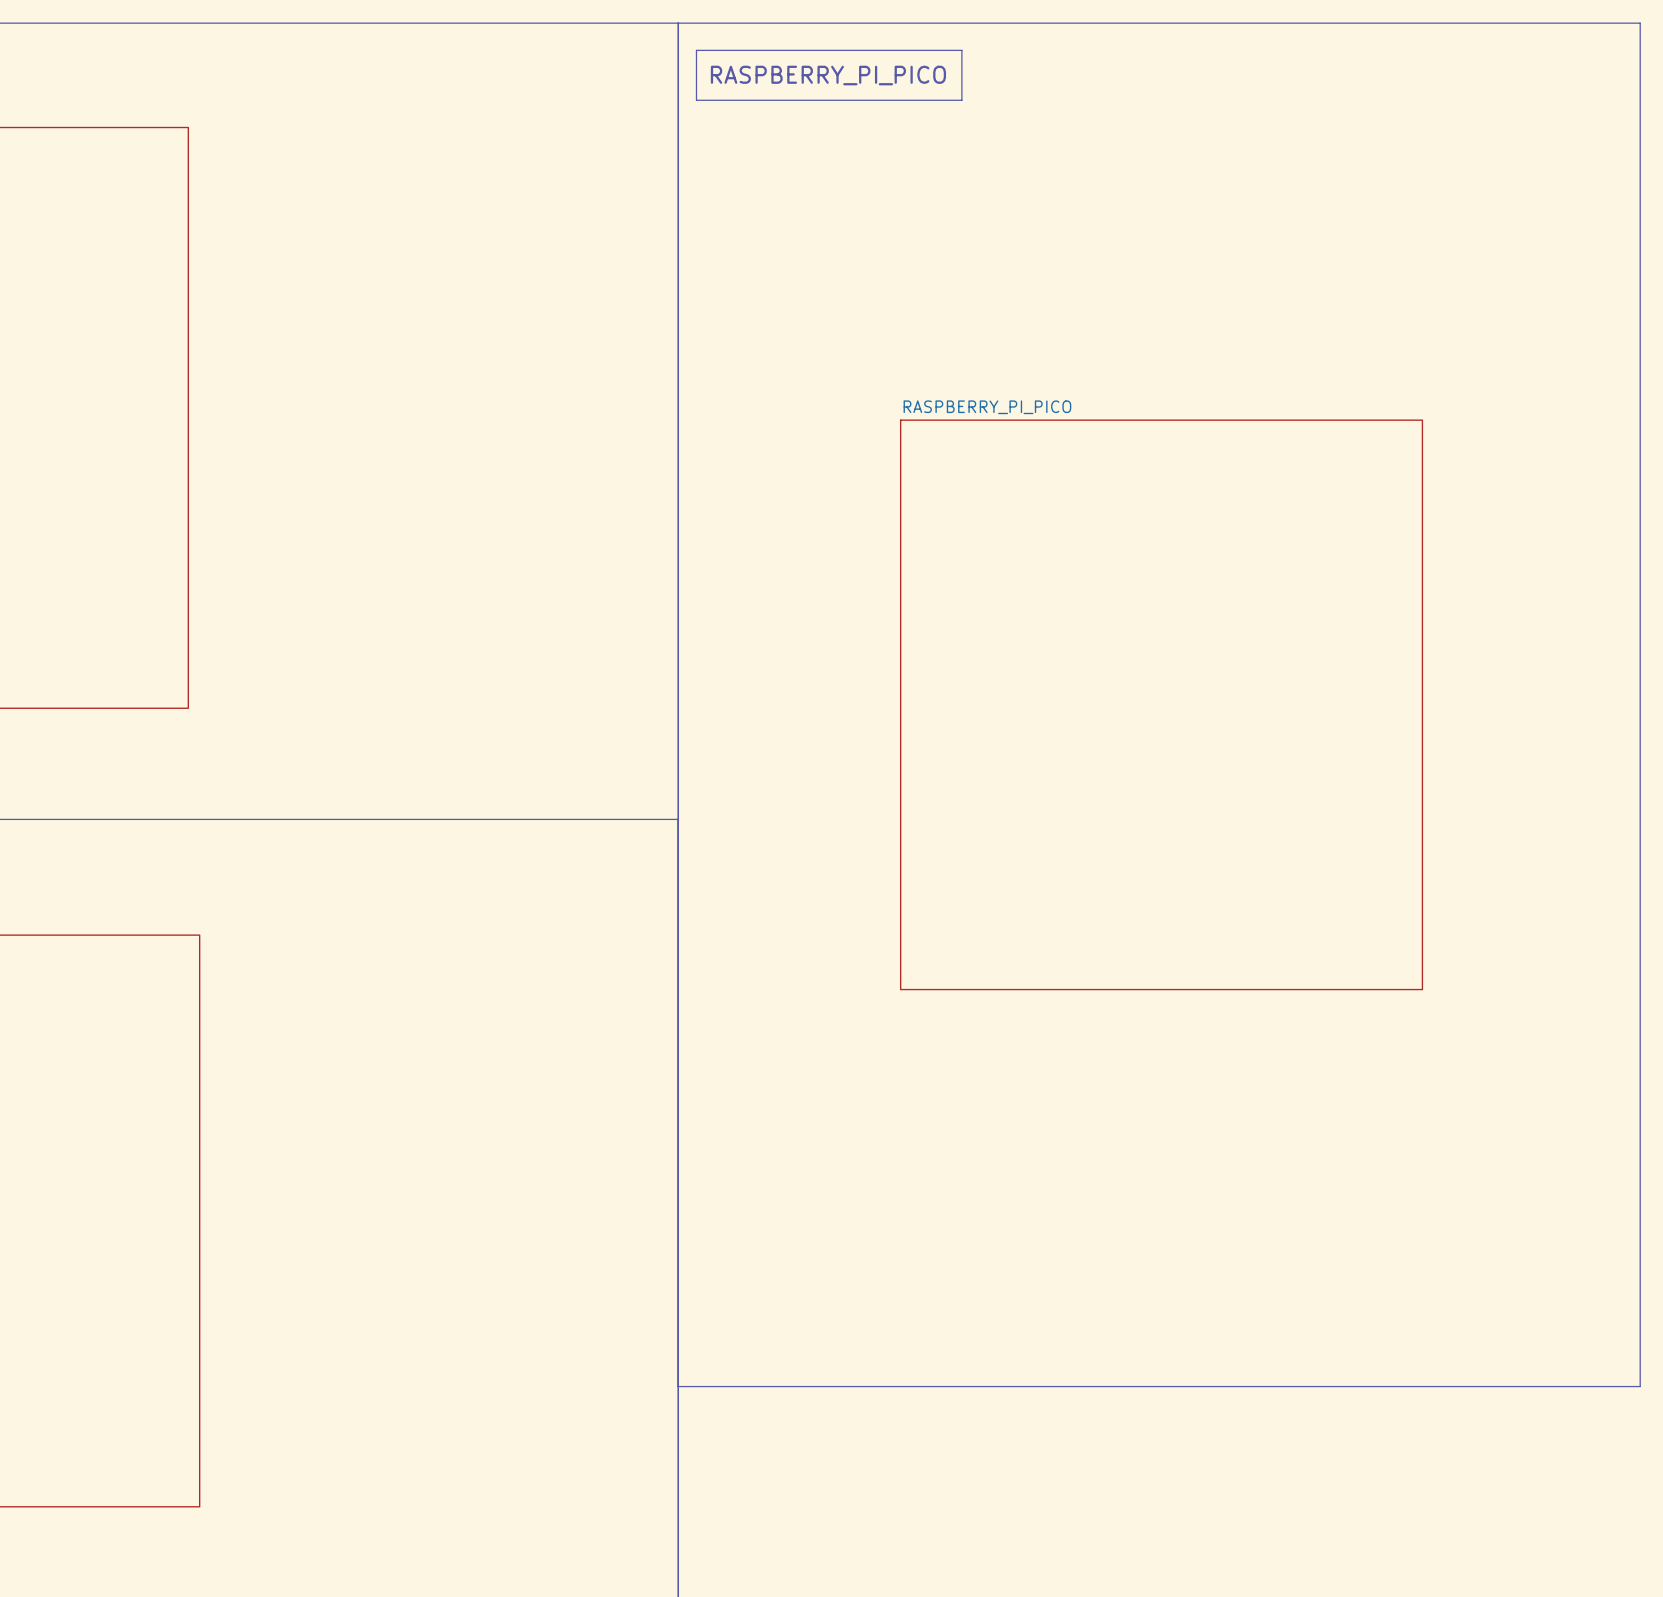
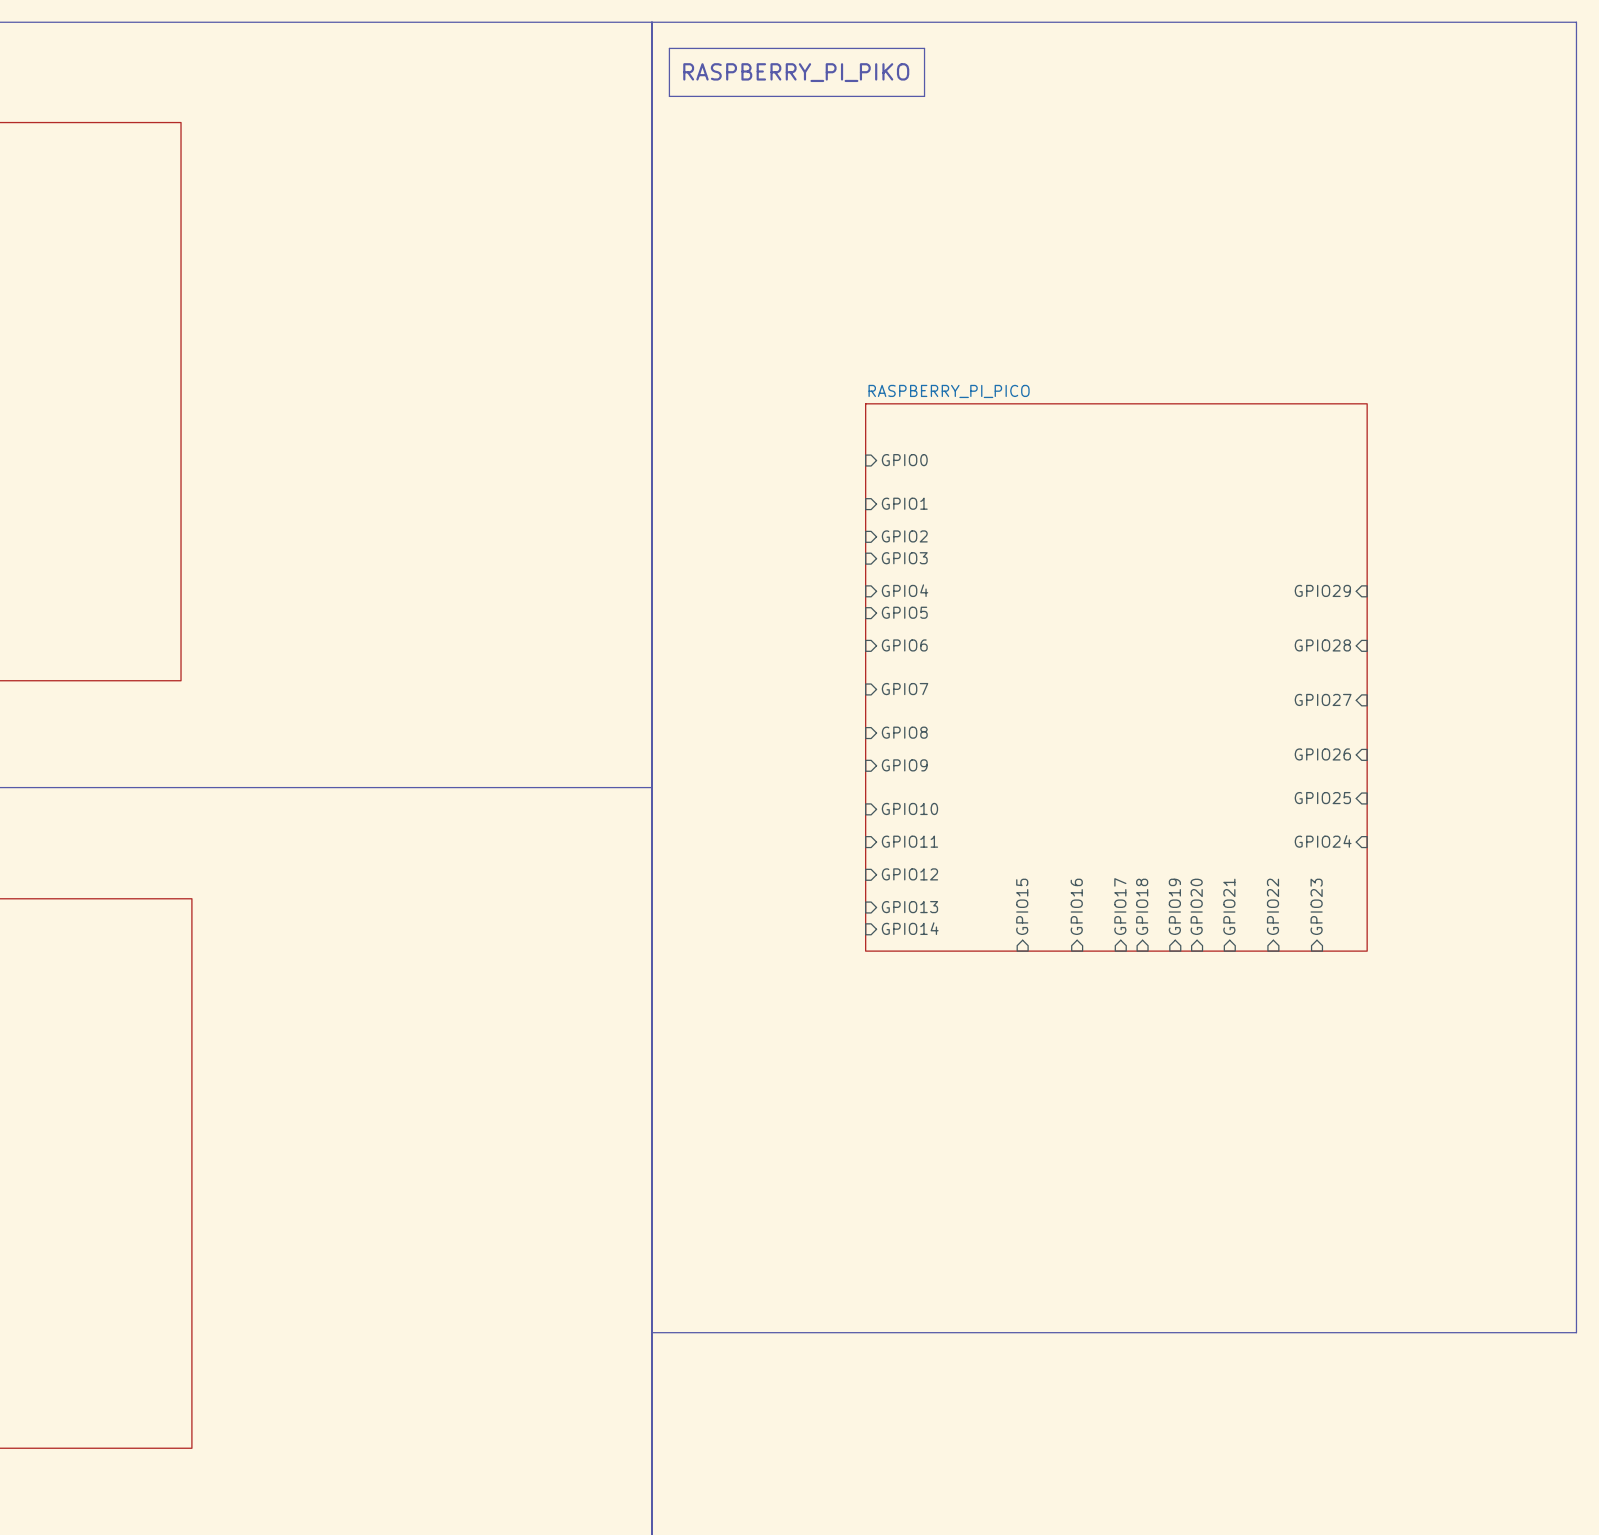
text: RASPBERRY_PI_PICO (828, 75) -> RASPBERRY_PI_PIKO (796, 72)
sheet pin: none -> GPIO0 (904, 460)
sheet pin: none -> GPIO1 (904, 503)
sheet pin: none -> GPIO2 (904, 536)
sheet pin: none -> GPIO3 (904, 558)
sheet pin: none -> GPIO4 (905, 590)
sheet pin: none -> GPIO29 (1322, 590)
sheet pin: none -> GPIO5 (904, 612)
sheet pin: none -> GPIO6 (904, 645)
sheet pin: none -> GPIO28 (1322, 645)
sheet pin: none -> GPIO7 (905, 689)
sheet pin: none -> GPIO27 (1323, 699)
sheet pin: none -> GPIO8 (904, 732)
sheet pin: none -> GPIO26 (1322, 754)
sheet pin: none -> GPIO9 (904, 765)
sheet pin: none -> GPIO25 (1322, 798)
sheet pin: none -> GPIO10 (909, 808)
sheet pin: none -> GPIO11 (909, 841)
sheet pin: none -> GPIO24 (1323, 841)
sheet pin: none -> GPIO12 (909, 874)
sheet pin: none -> GPIO13 (909, 907)
sheet pin: none -> GPIO15 (1022, 906)
sheet pin: none -> GPIO16 (1076, 906)
sheet pin: none -> GPIO17 (1120, 906)
sheet pin: none -> GPIO18 (1142, 906)
sheet pin: none -> GPIO19 (1174, 906)
sheet pin: none -> GPIO20 (1196, 906)
sheet pin: none -> GPIO21 (1229, 906)
sheet pin: none -> GPIO22 (1272, 906)
sheet pin: none -> GPIO23 (1316, 906)
sheet pin: none -> GPIO14 (910, 928)

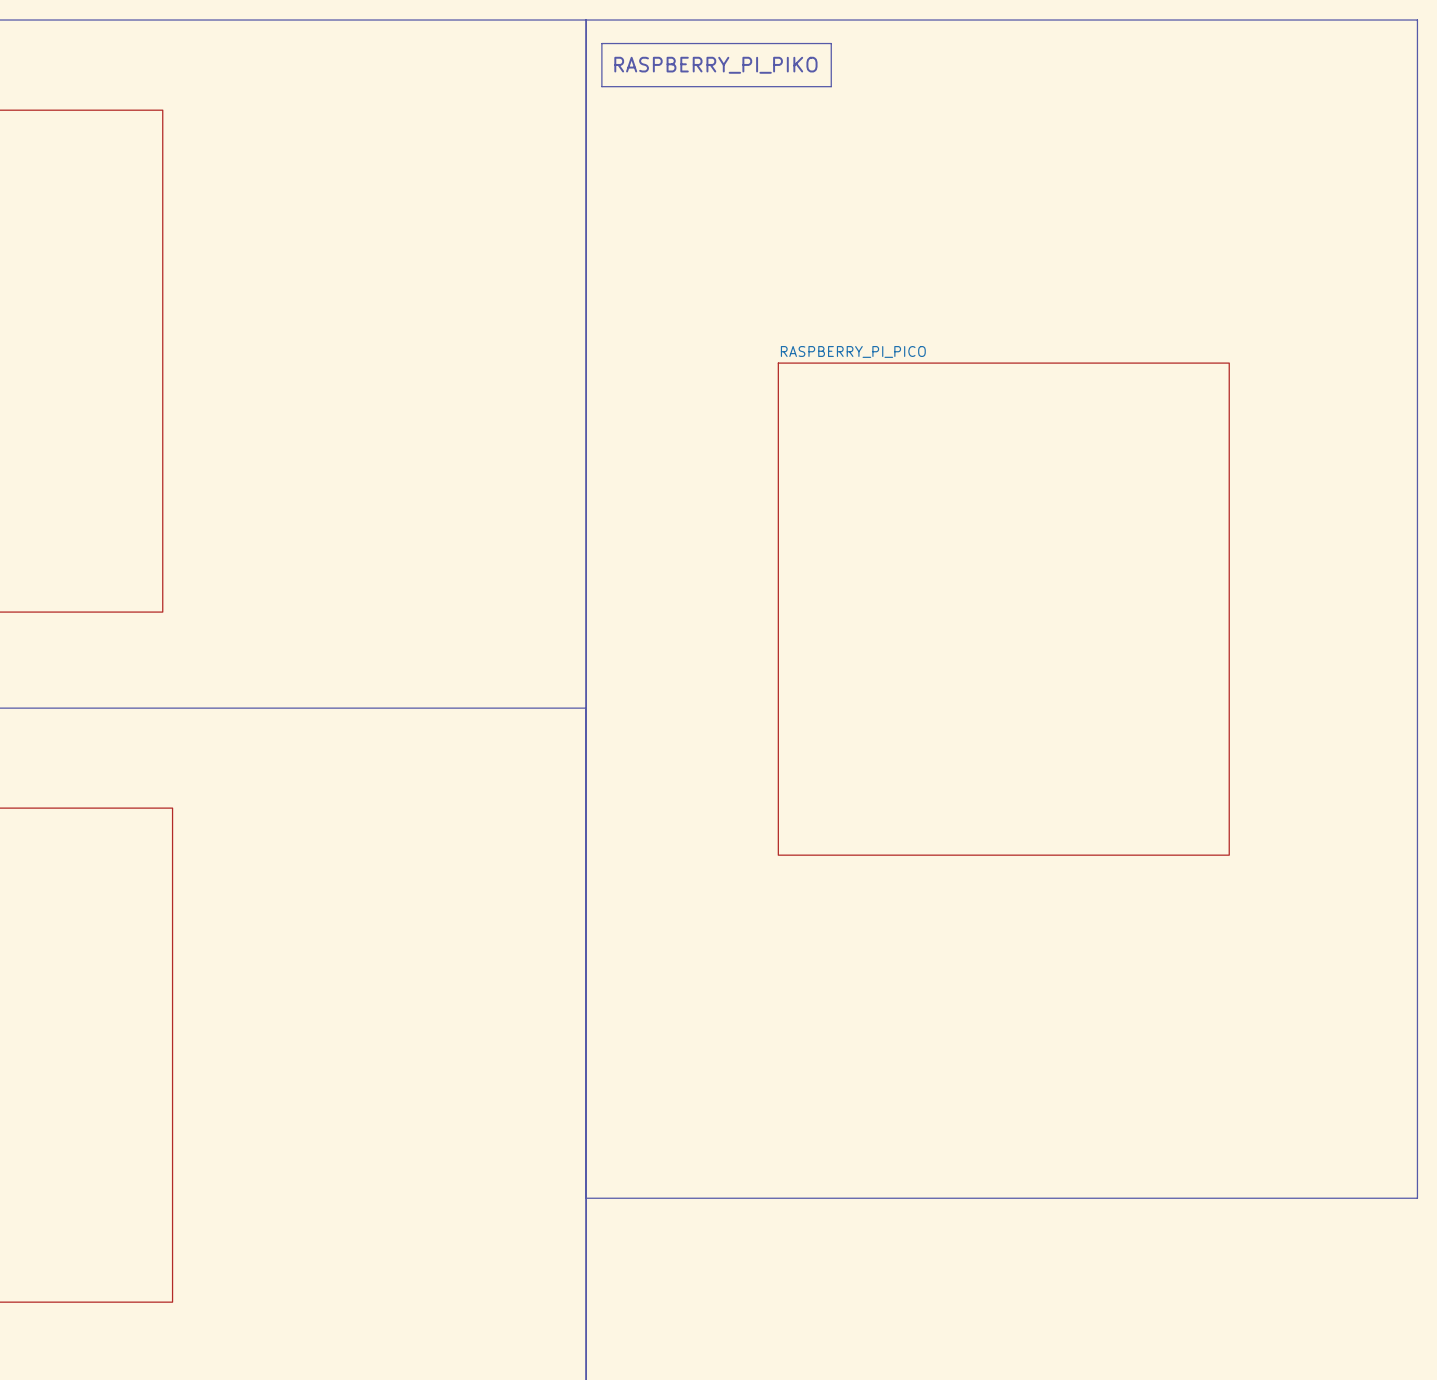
sheet pin: GPIO0 (904, 460) -> none
sheet pin: GPIO1 (904, 503) -> none
sheet pin: GPIO2 (904, 536) -> none
sheet pin: GPIO3 (904, 558) -> none
sheet pin: GPIO4 (905, 590) -> none
sheet pin: GPIO29 (1322, 590) -> none
sheet pin: GPIO5 (904, 612) -> none
sheet pin: GPIO6 (904, 645) -> none
sheet pin: GPIO28 (1322, 645) -> none
sheet pin: GPIO7 (905, 689) -> none
sheet pin: GPIO27 (1323, 699) -> none
sheet pin: GPIO8 (904, 732) -> none
sheet pin: GPIO26 (1322, 754) -> none
sheet pin: GPIO9 (904, 765) -> none
sheet pin: GPIO25 (1322, 798) -> none
sheet pin: GPIO10 (909, 808) -> none
sheet pin: GPIO11 (909, 841) -> none
sheet pin: GPIO24 (1323, 841) -> none
sheet pin: GPIO12 (909, 874) -> none
sheet pin: GPIO15 (1022, 906) -> none
sheet pin: GPIO16 (1076, 906) -> none
sheet pin: GPIO17 (1120, 906) -> none
sheet pin: GPIO18 (1142, 906) -> none
sheet pin: GPIO19 (1174, 906) -> none
sheet pin: GPIO20 (1196, 906) -> none
sheet pin: GPIO21 (1229, 906) -> none
sheet pin: GPIO22 (1272, 906) -> none
sheet pin: GPIO23 (1316, 906) -> none
sheet pin: GPIO13 (909, 907) -> none
sheet pin: GPIO14 (910, 928) -> none

